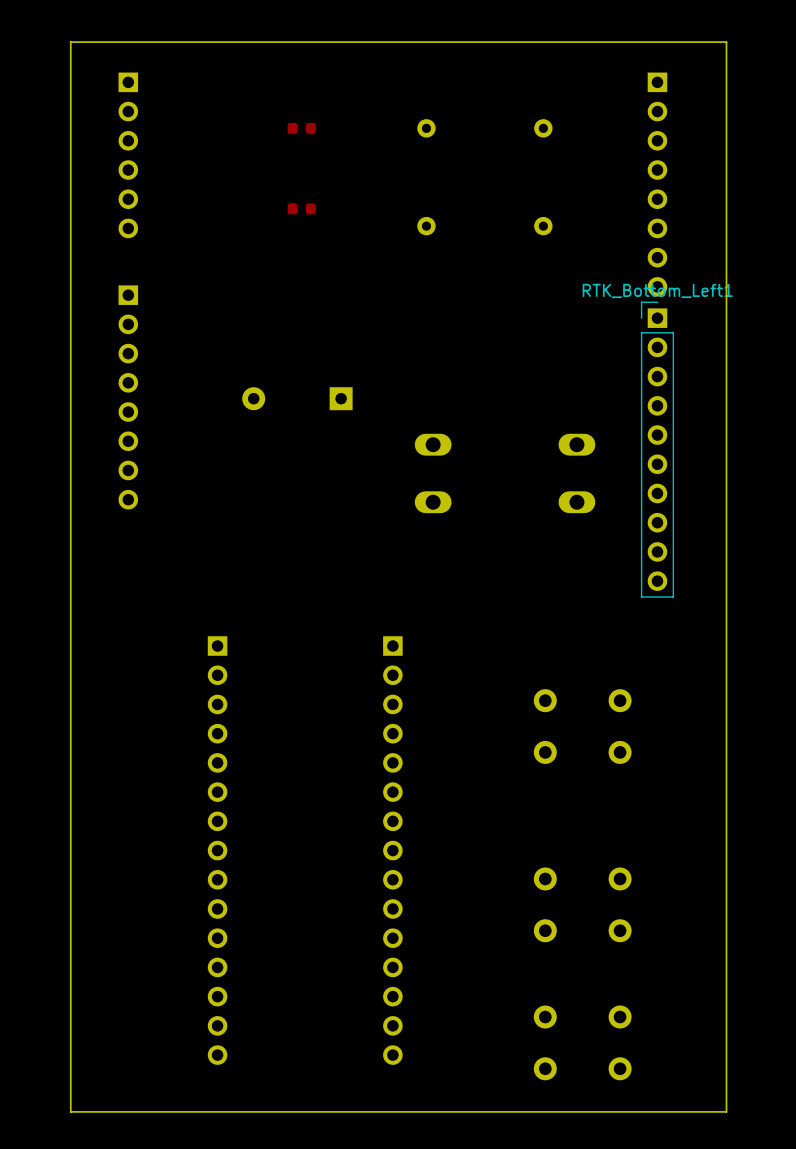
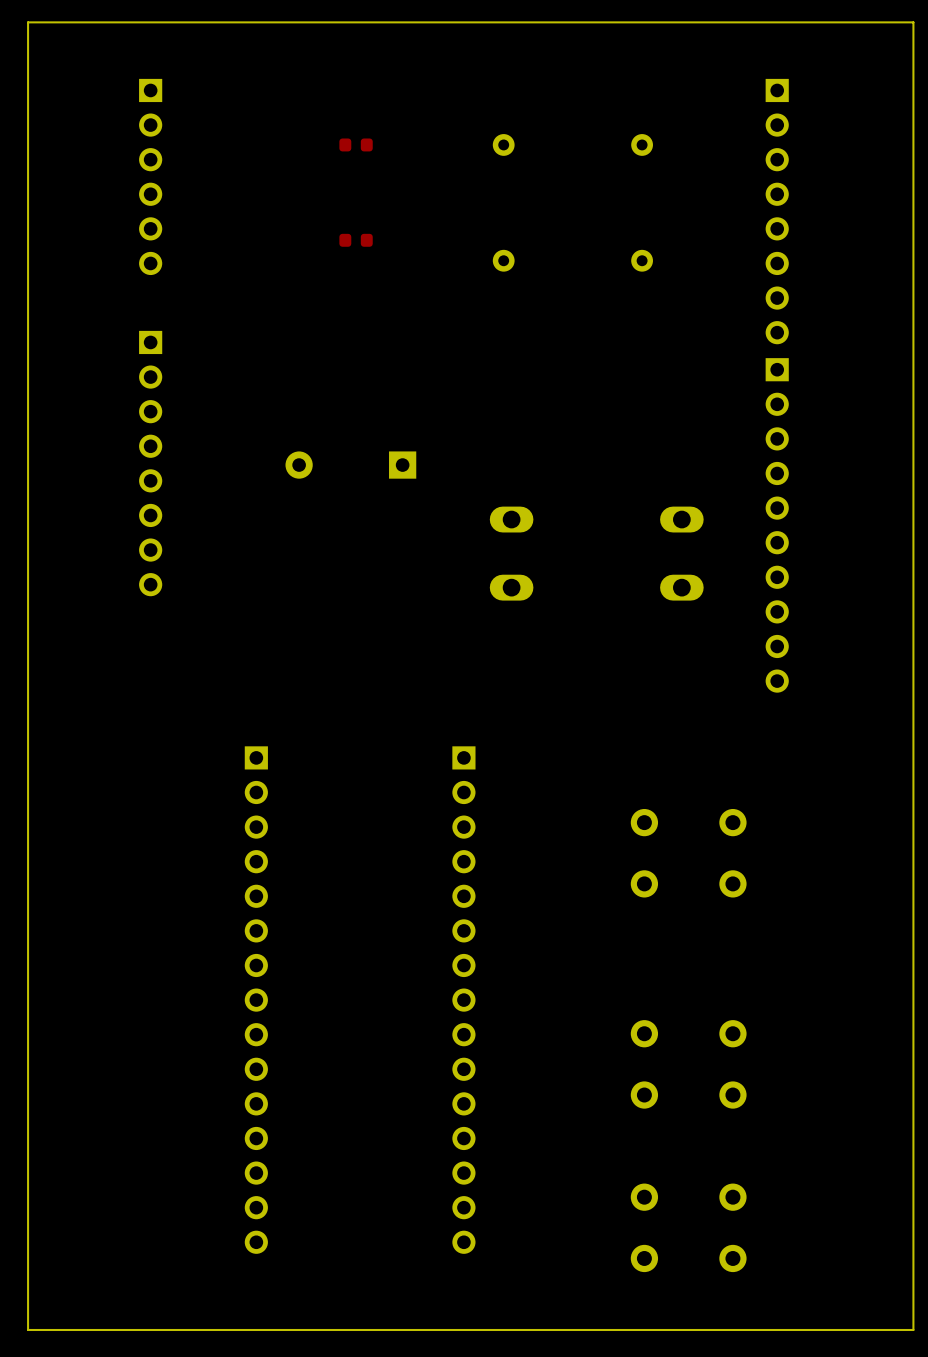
board edge: (726, 42) (70, 42) (70, 1111) (726, 1111) (726, 42) -> (913, 22) (913, 1329) (28, 1329) (28, 22) (913, 22)
RTK_Bottom_Left1 side: top (657, 449) -> bottom (777, 525)

